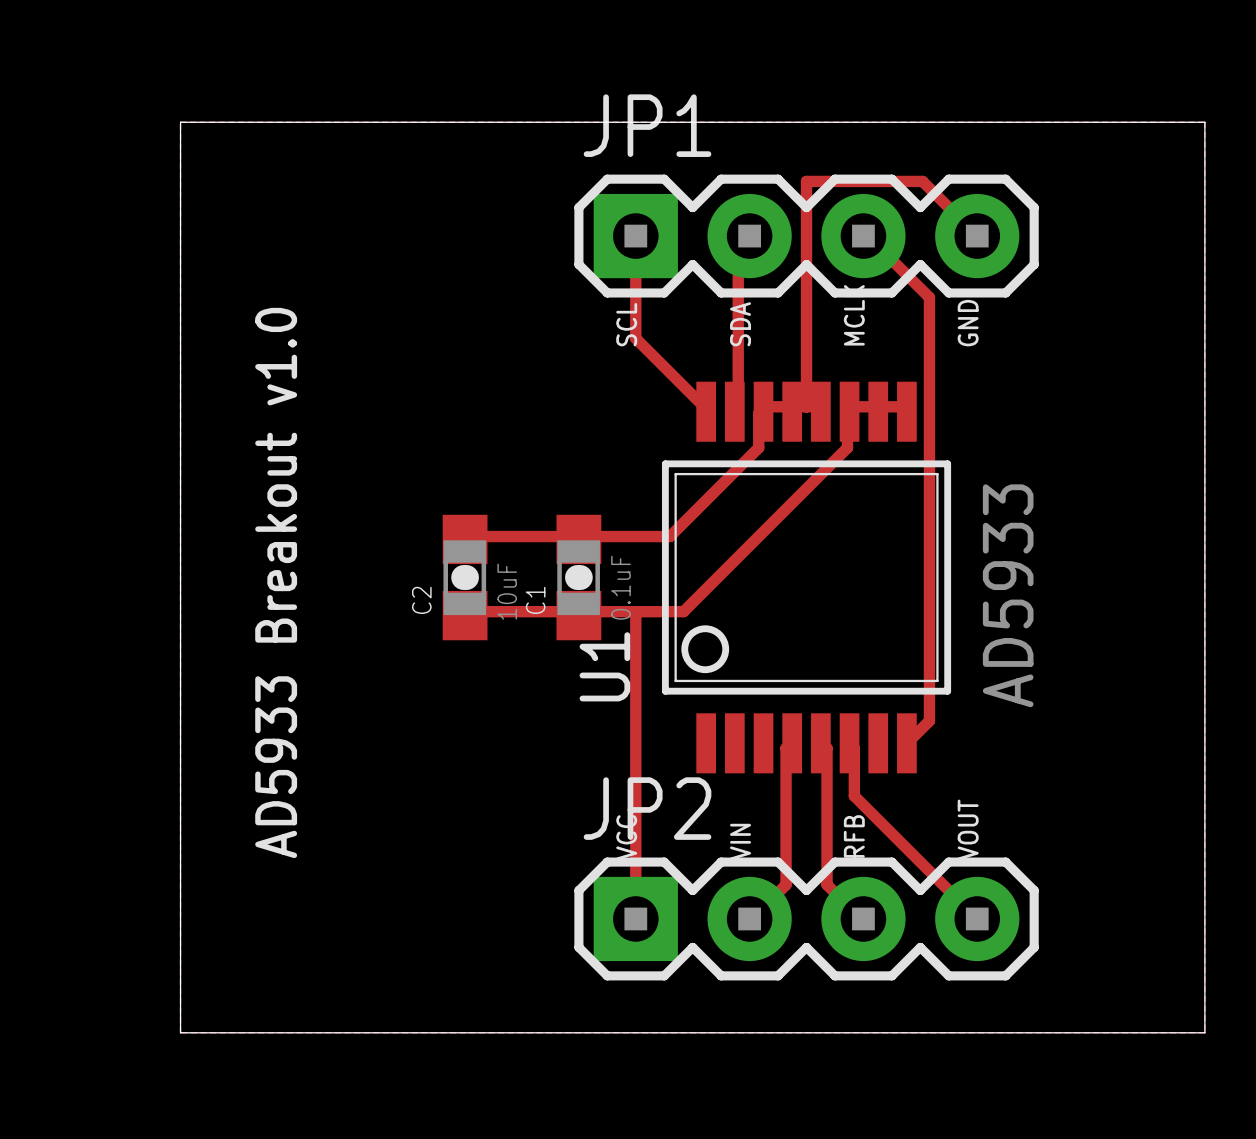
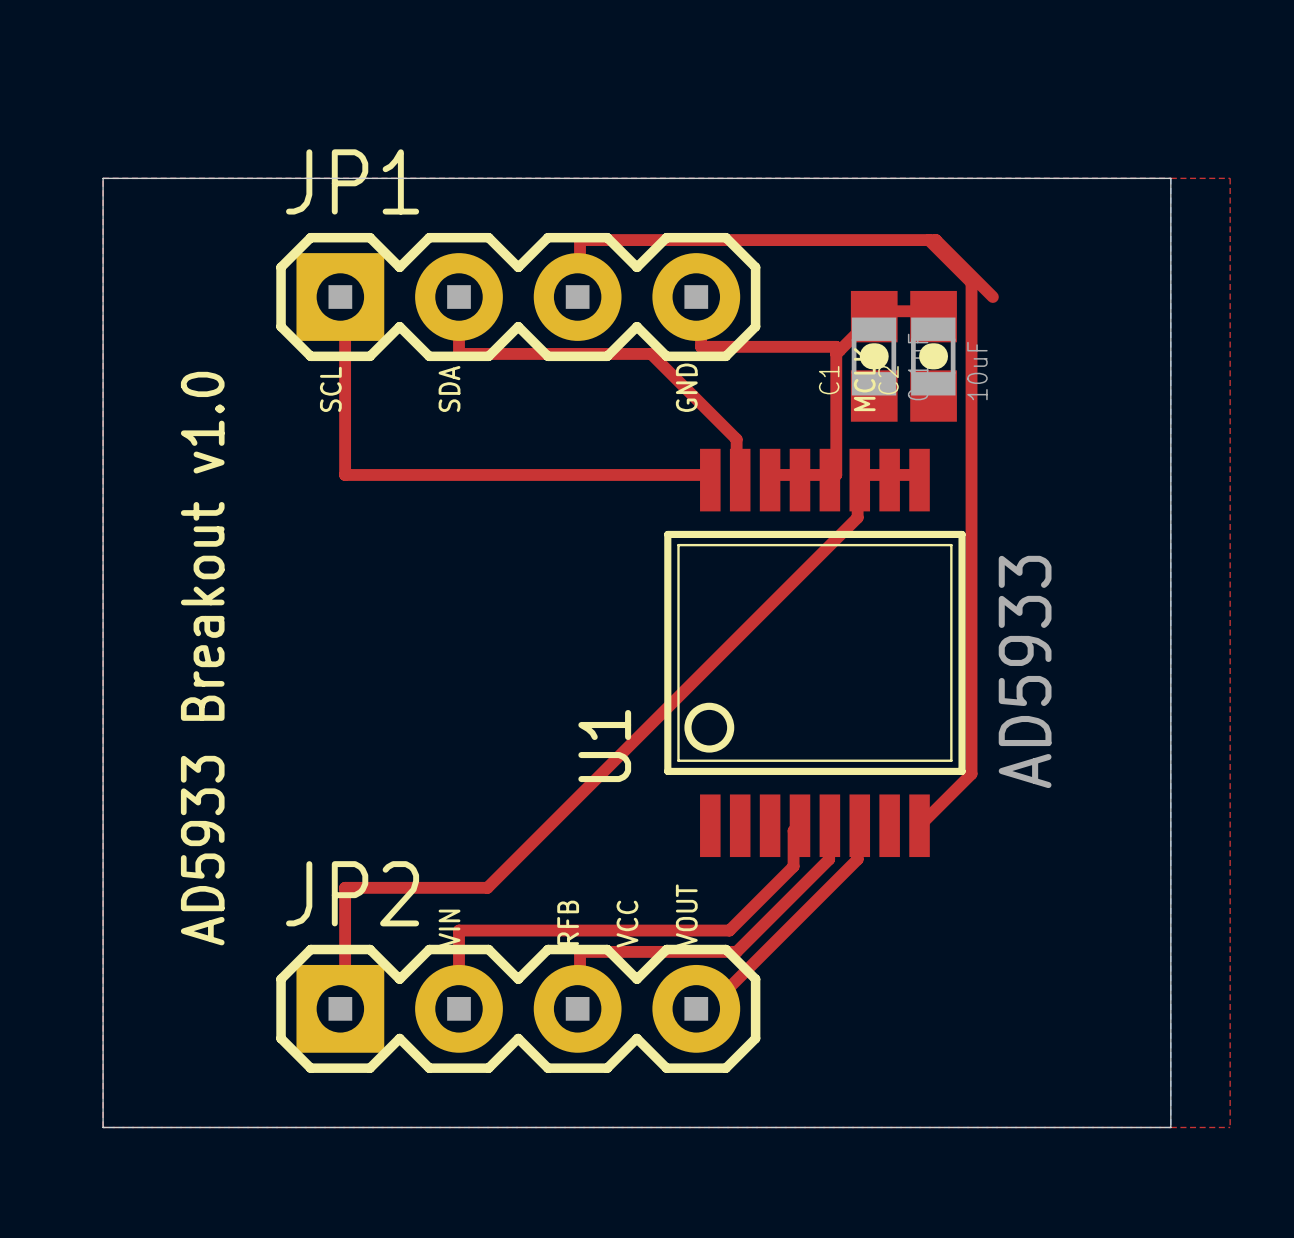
board edge: (180, 122) (180, 1032) -> (162, 178) (103, 178) (103, 1127) (162, 1127)
board edge: (1147, 122) (1204, 122) (1204, 1032) (1147, 1032) -> (1170, 178) (1170, 1127)
top track: (806, 181) (806, 406) -> (814, 240) (580, 240) (580, 297) (577, 297)
top track: (635, 236) (635, 338) (704, 406) -> (340, 297) (345, 297) (345, 474) (708, 474)
top track: none -> (696, 297) (701, 297) (701, 346) (836, 346) (839, 350)
top track: (749, 236) (745, 236) (738, 242) (738, 406) (734, 411) -> (459, 297) (459, 353) (651, 353) (736, 439) (736, 474) (740, 480)
JP1 position: (806, 236) -> (518, 297)
top track: (863, 236) (868, 236) (929, 297) (929, 720) -> (928, 240) (971, 282) (971, 773) (943, 802)
top track: none -> (933, 316) (928, 311) (878, 311) (836, 353) (836, 474) (829, 480)
text position: GND (968, 323) -> GND (686, 387)
text position: SCL (626, 324) -> SCL (330, 389)
text position: SDA (740, 324) -> SDA (449, 388)
top track: (763, 411) (758, 413) (758, 447) (669, 536) (581, 536) (578, 539) (574, 536) (465, 536) (465, 539) -> none
C2 position: (465, 577) -> (933, 356)
C1 position: (578, 577) -> (874, 356)
text position: AD5933 Breakout v1.0 (276, 582) -> AD5933 Breakout v1.0 (202, 658)
top track: (635, 611) (635, 918) -> none
top track: (683, 611) (581, 611) (578, 615) (574, 611) (465, 611) (465, 615) -> (686, 688) (487, 887) (345, 887) (345, 1008) (340, 1008)
top track: (820, 743) (827, 748) (827, 884) (861, 918) (863, 918) -> (829, 825) (829, 859) (736, 951) (580, 951) (580, 1008) (577, 1008)
top track: (849, 743) (854, 748) (854, 796) (977, 918) -> (859, 825) (857, 830) (857, 859) (708, 1008) (696, 1008)
top track: (786, 782) (786, 884) (751, 918) (749, 918) -> (793, 866) (729, 930) (459, 930) (459, 1008)
text position: VOUT (968, 829) -> VOUT (686, 915)
text position: RFB (854, 836) -> RFB (568, 922)
text position: VIN (740, 841) -> VIN (449, 928)
JP2 position: (806, 918) -> (518, 1008)

